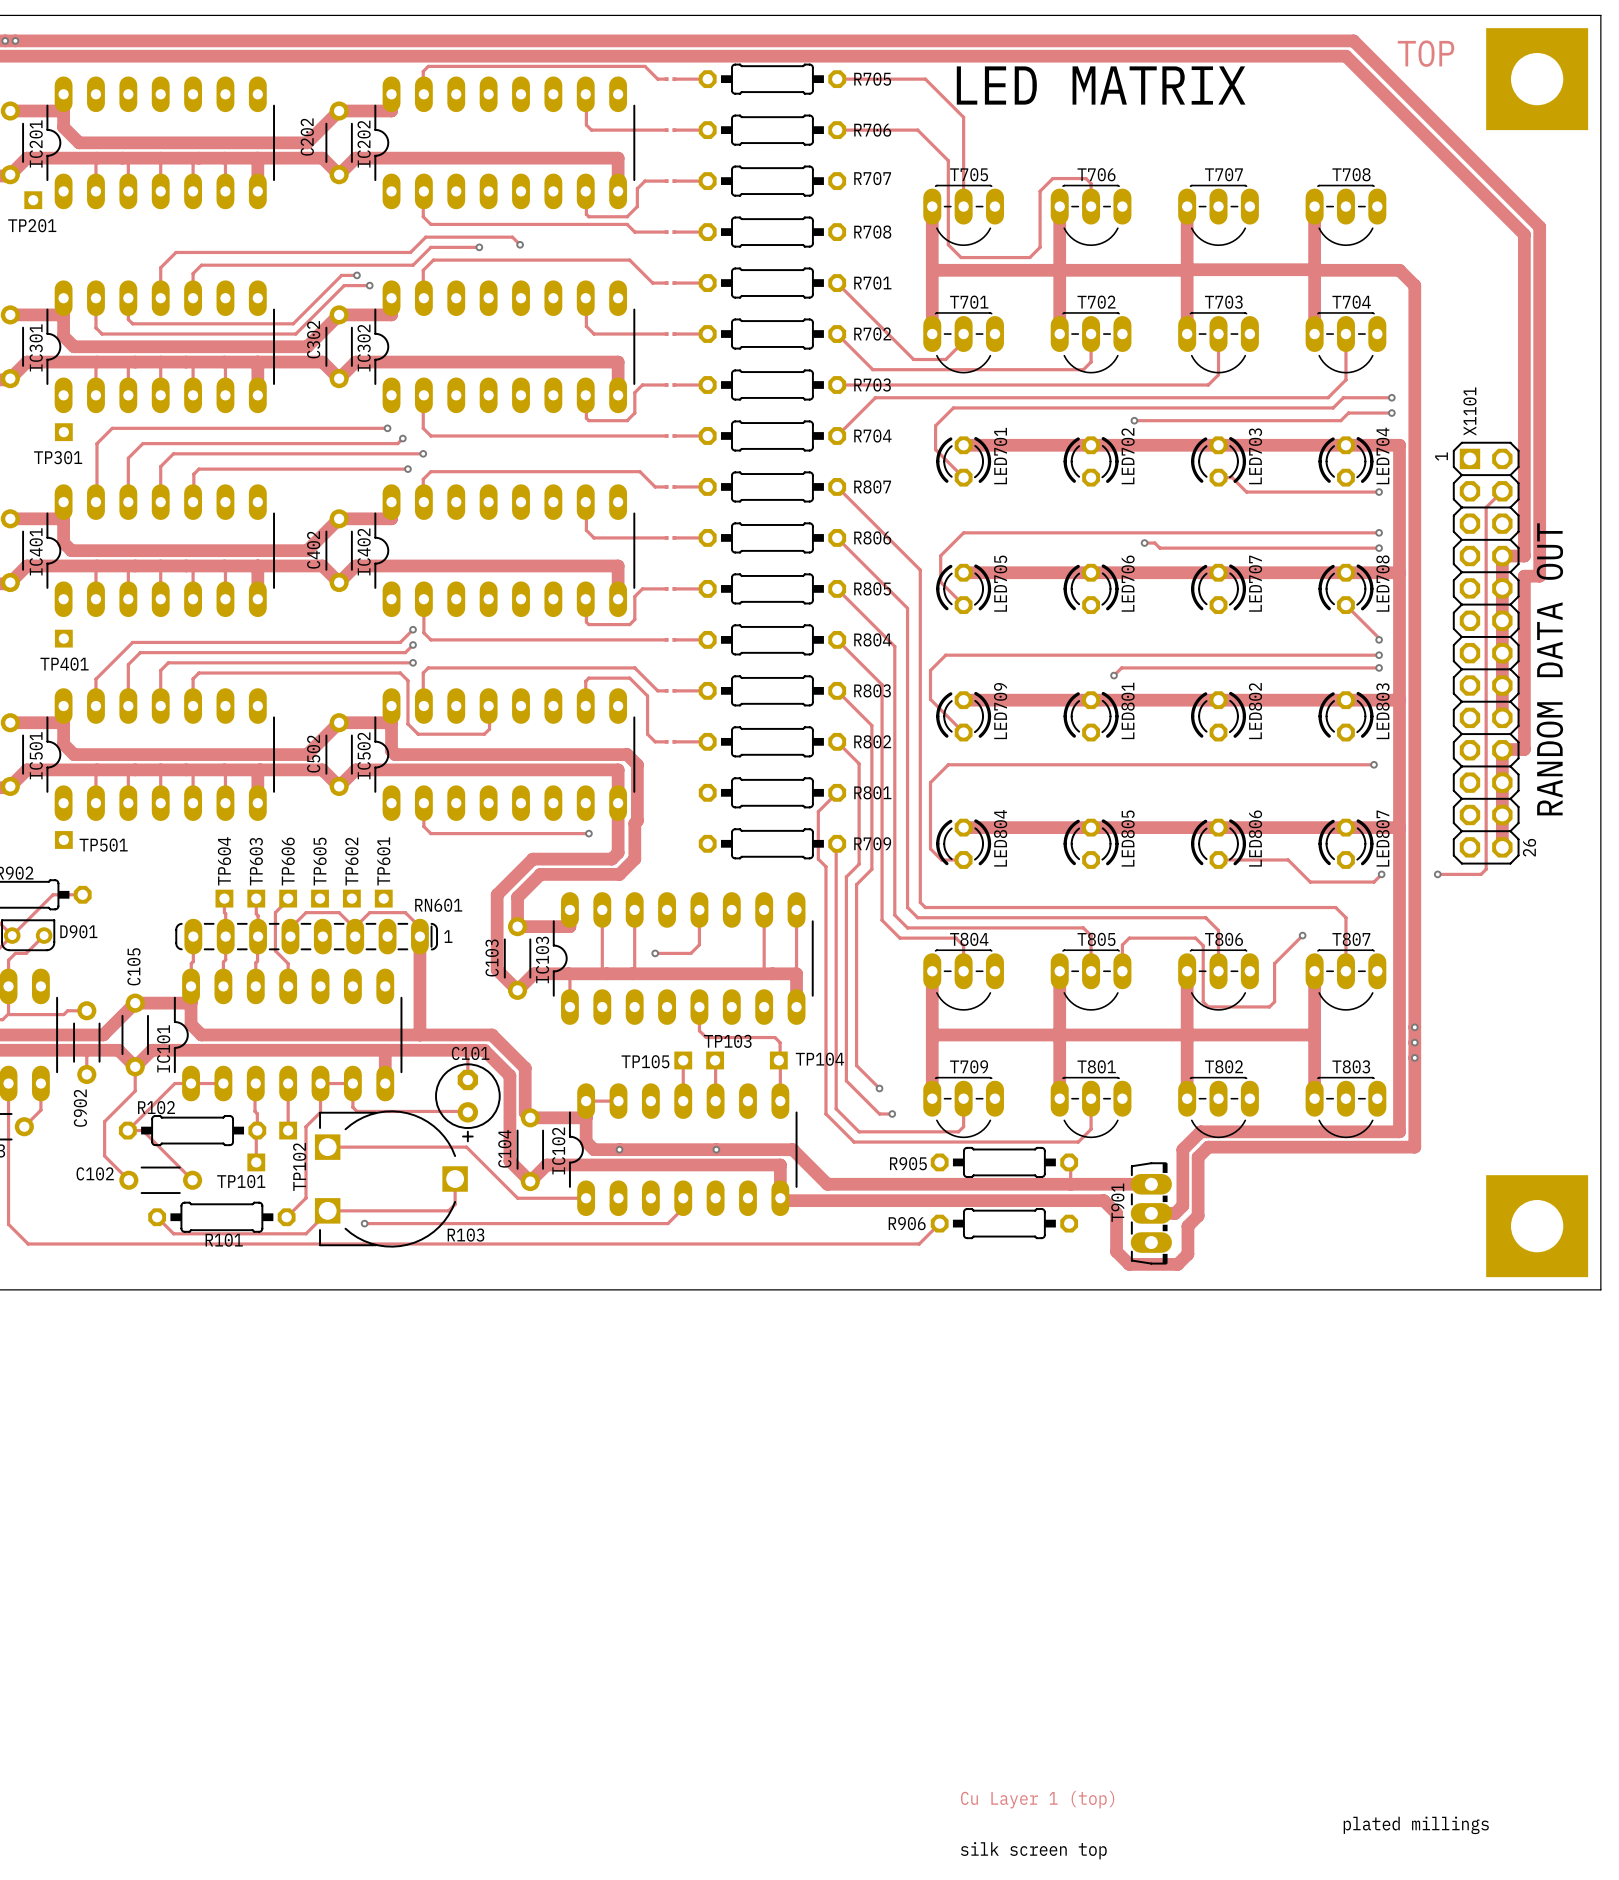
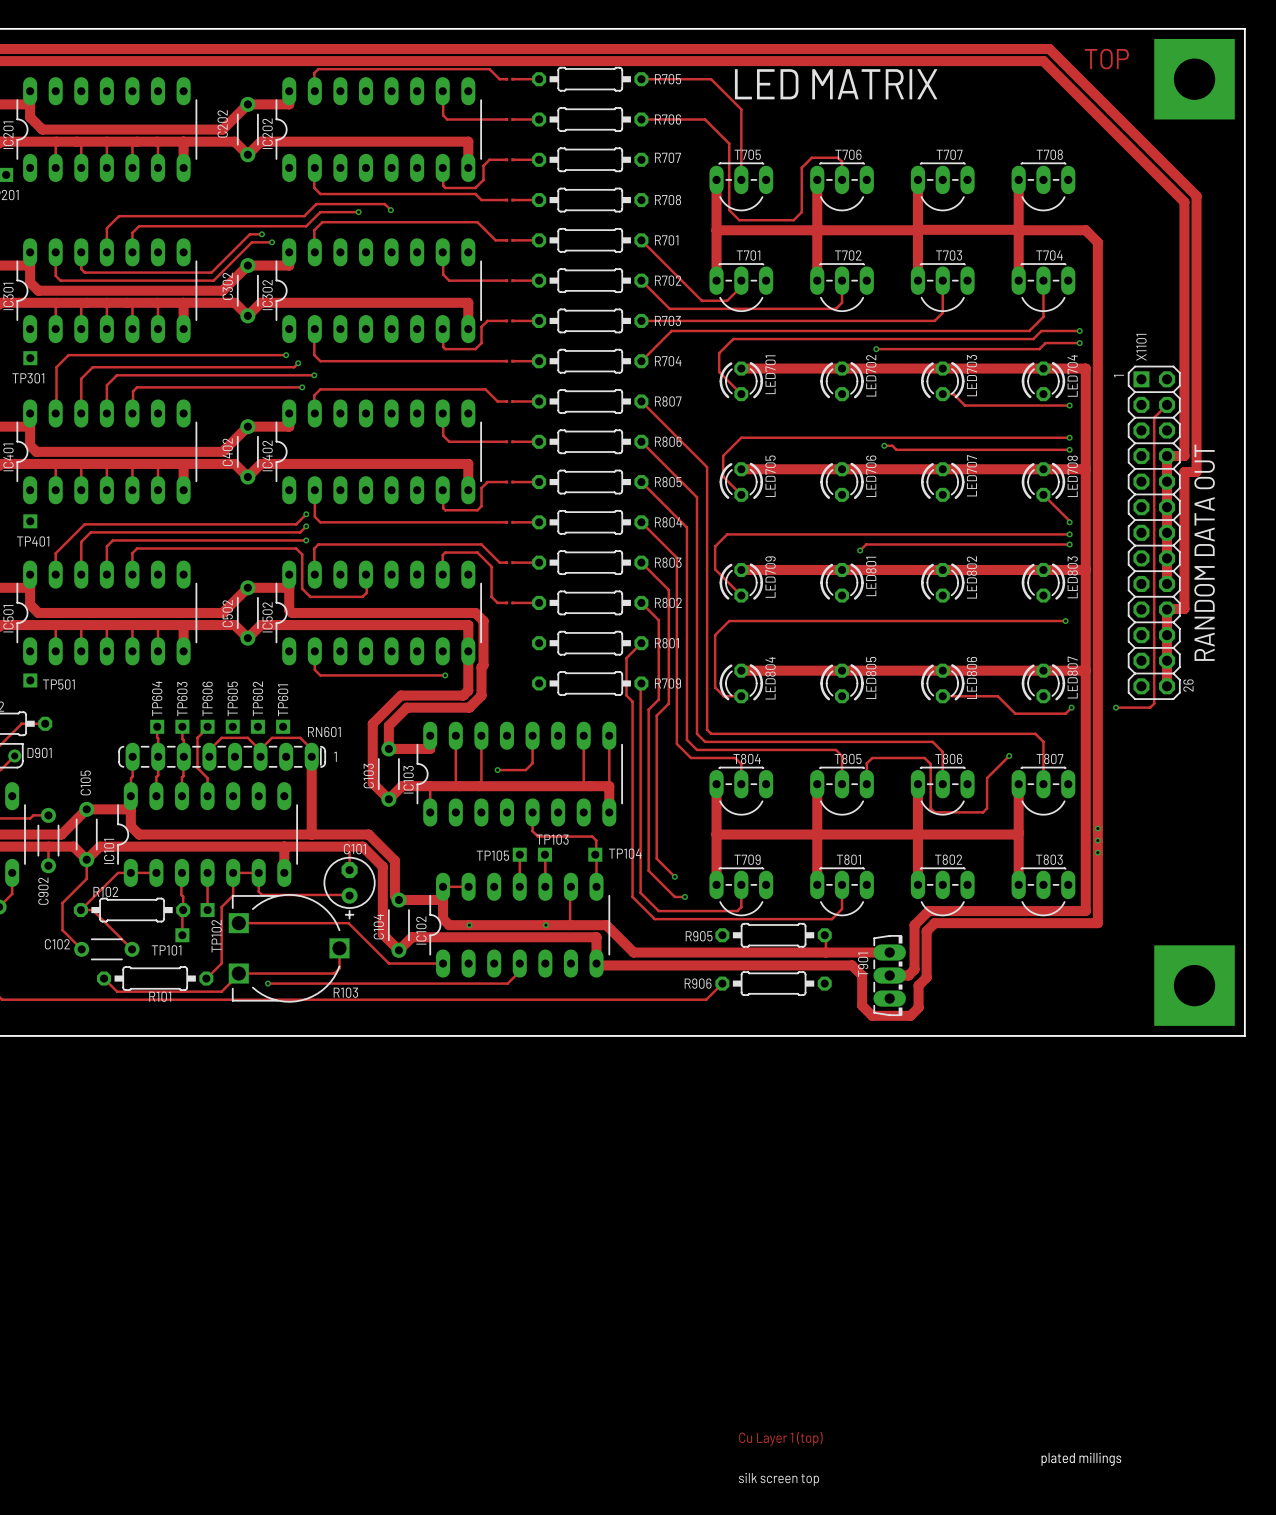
track: none -> (570, 886) (570, 925)

